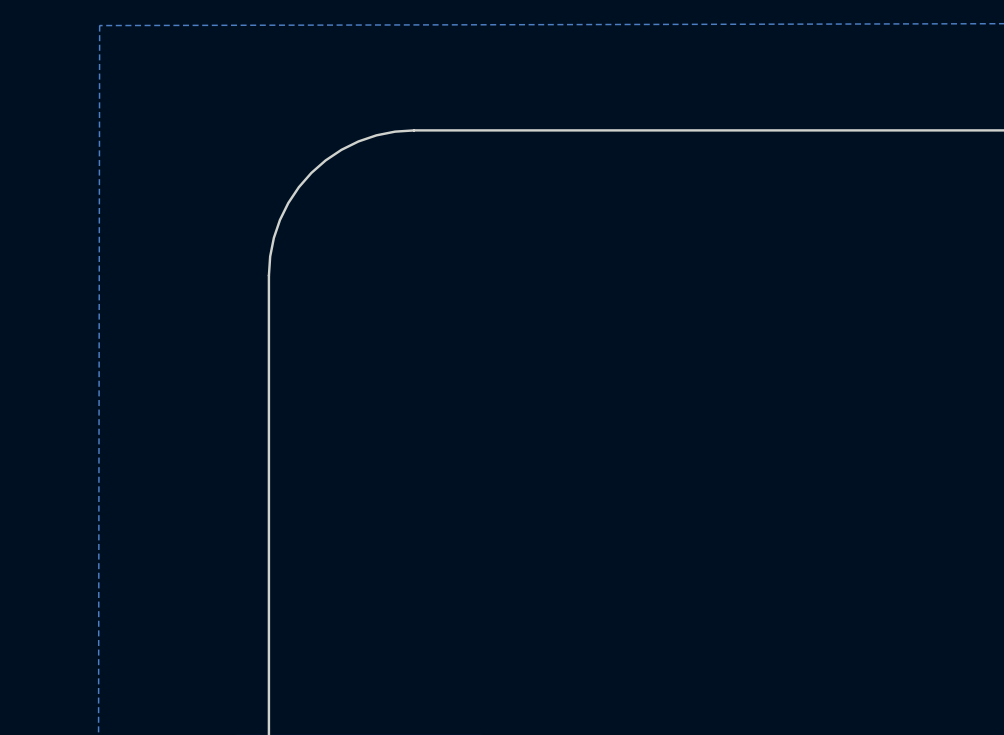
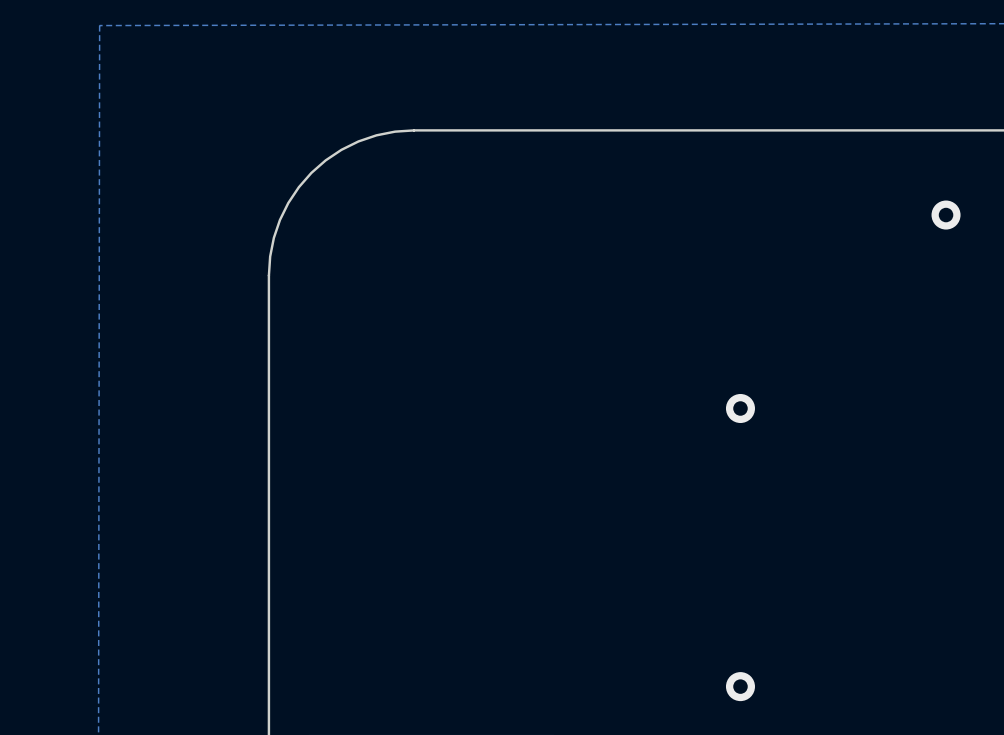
via: none -> (946, 215)
via: none -> (740, 408)
via: none -> (740, 686)

